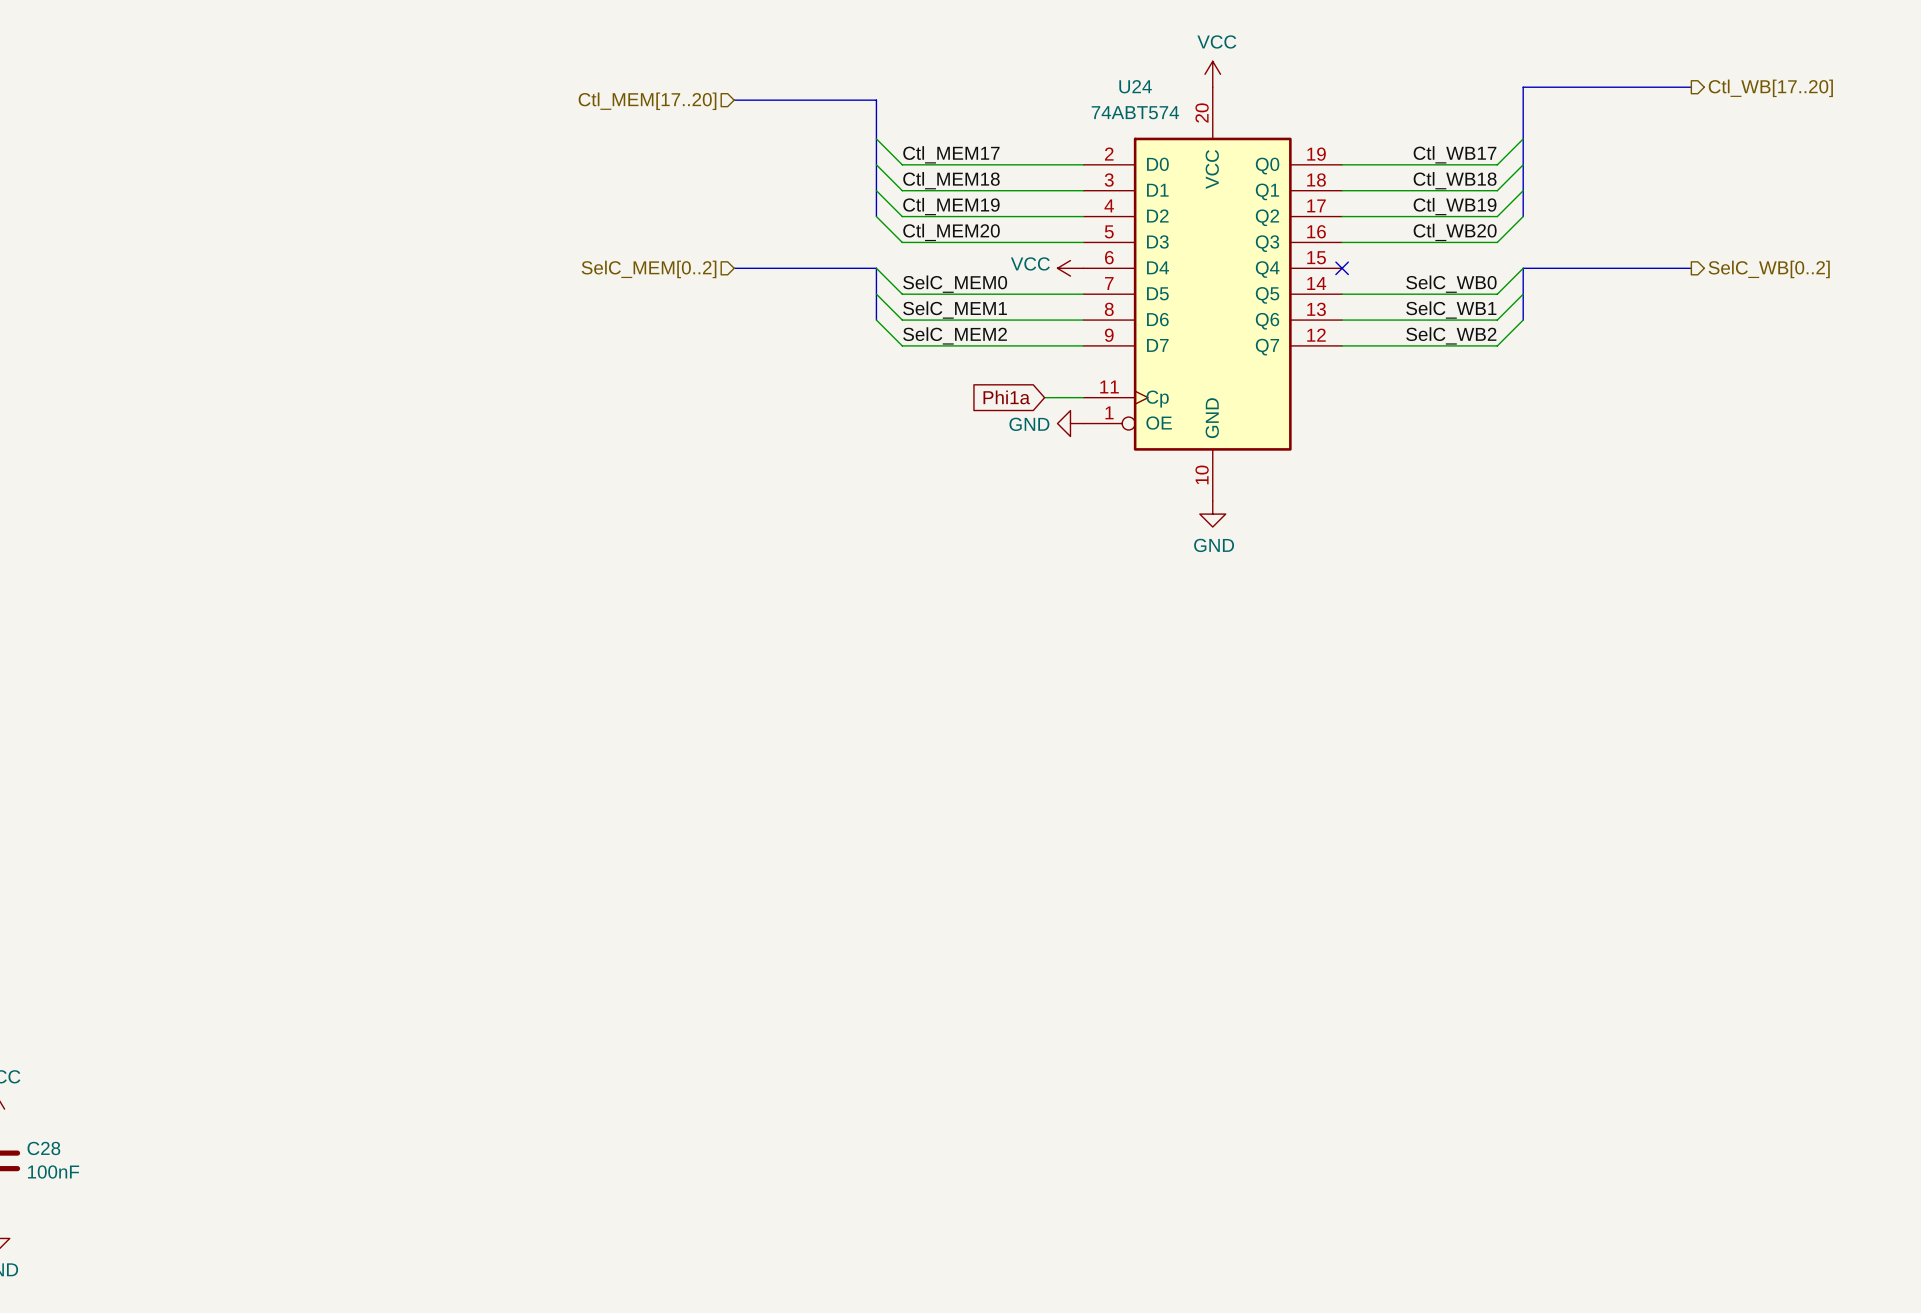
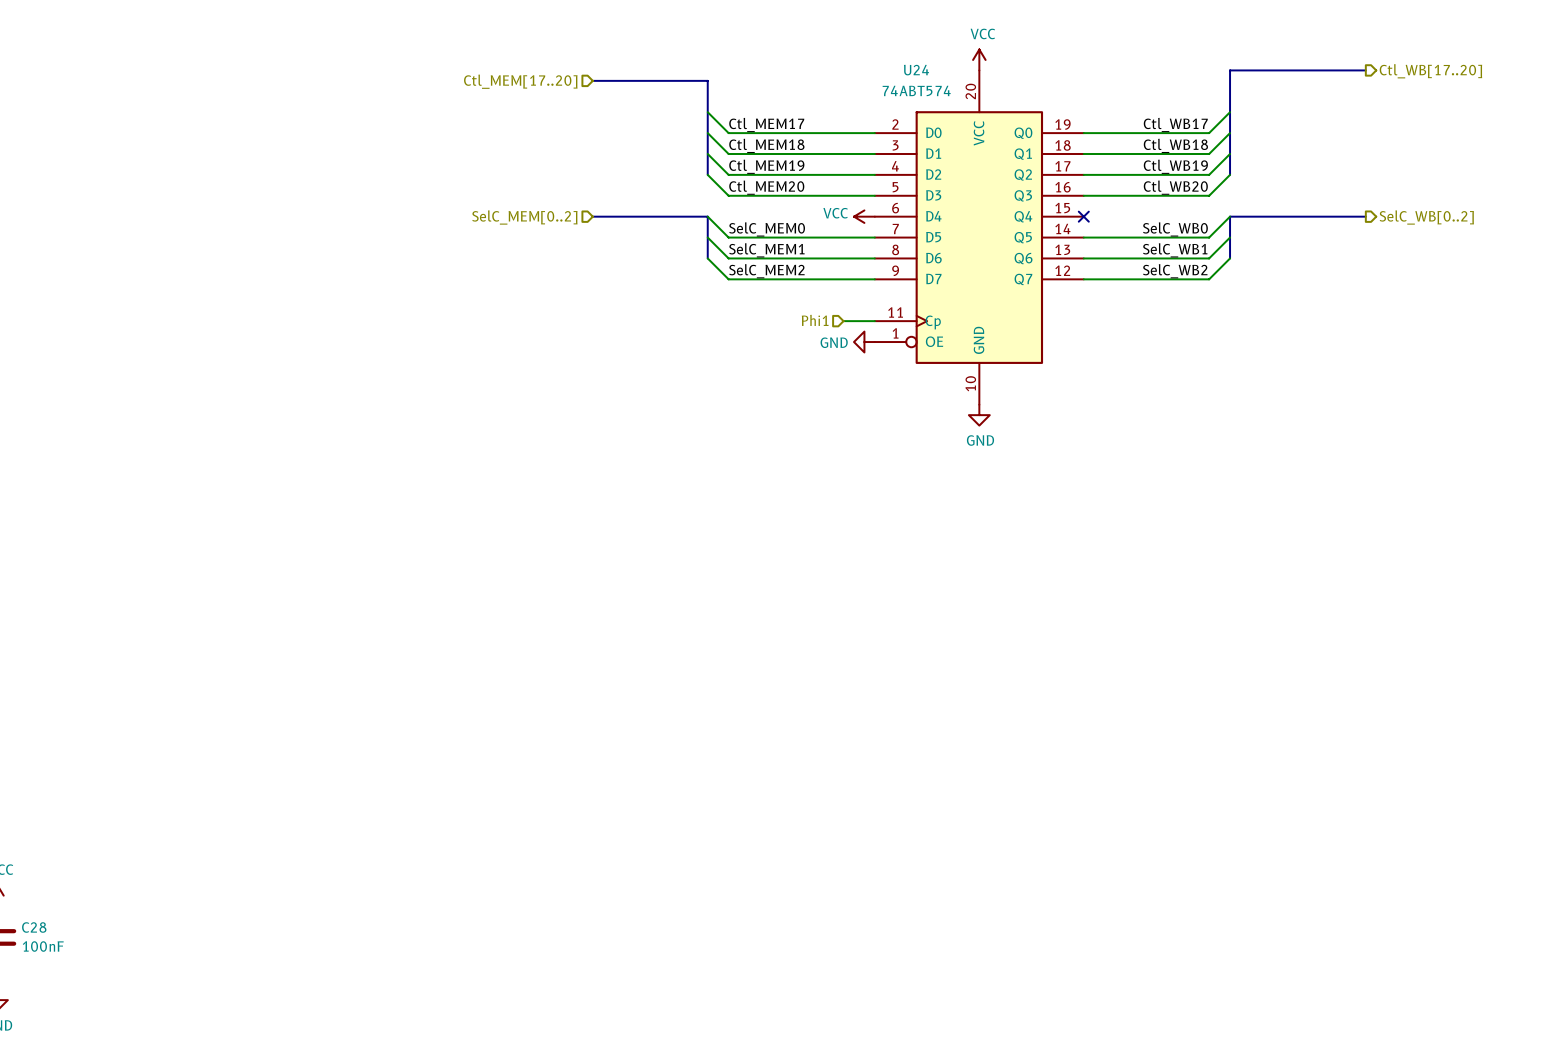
hierarchical label: none -> Phi1 (815, 320)
global label: Phi1a (1006, 397) -> none

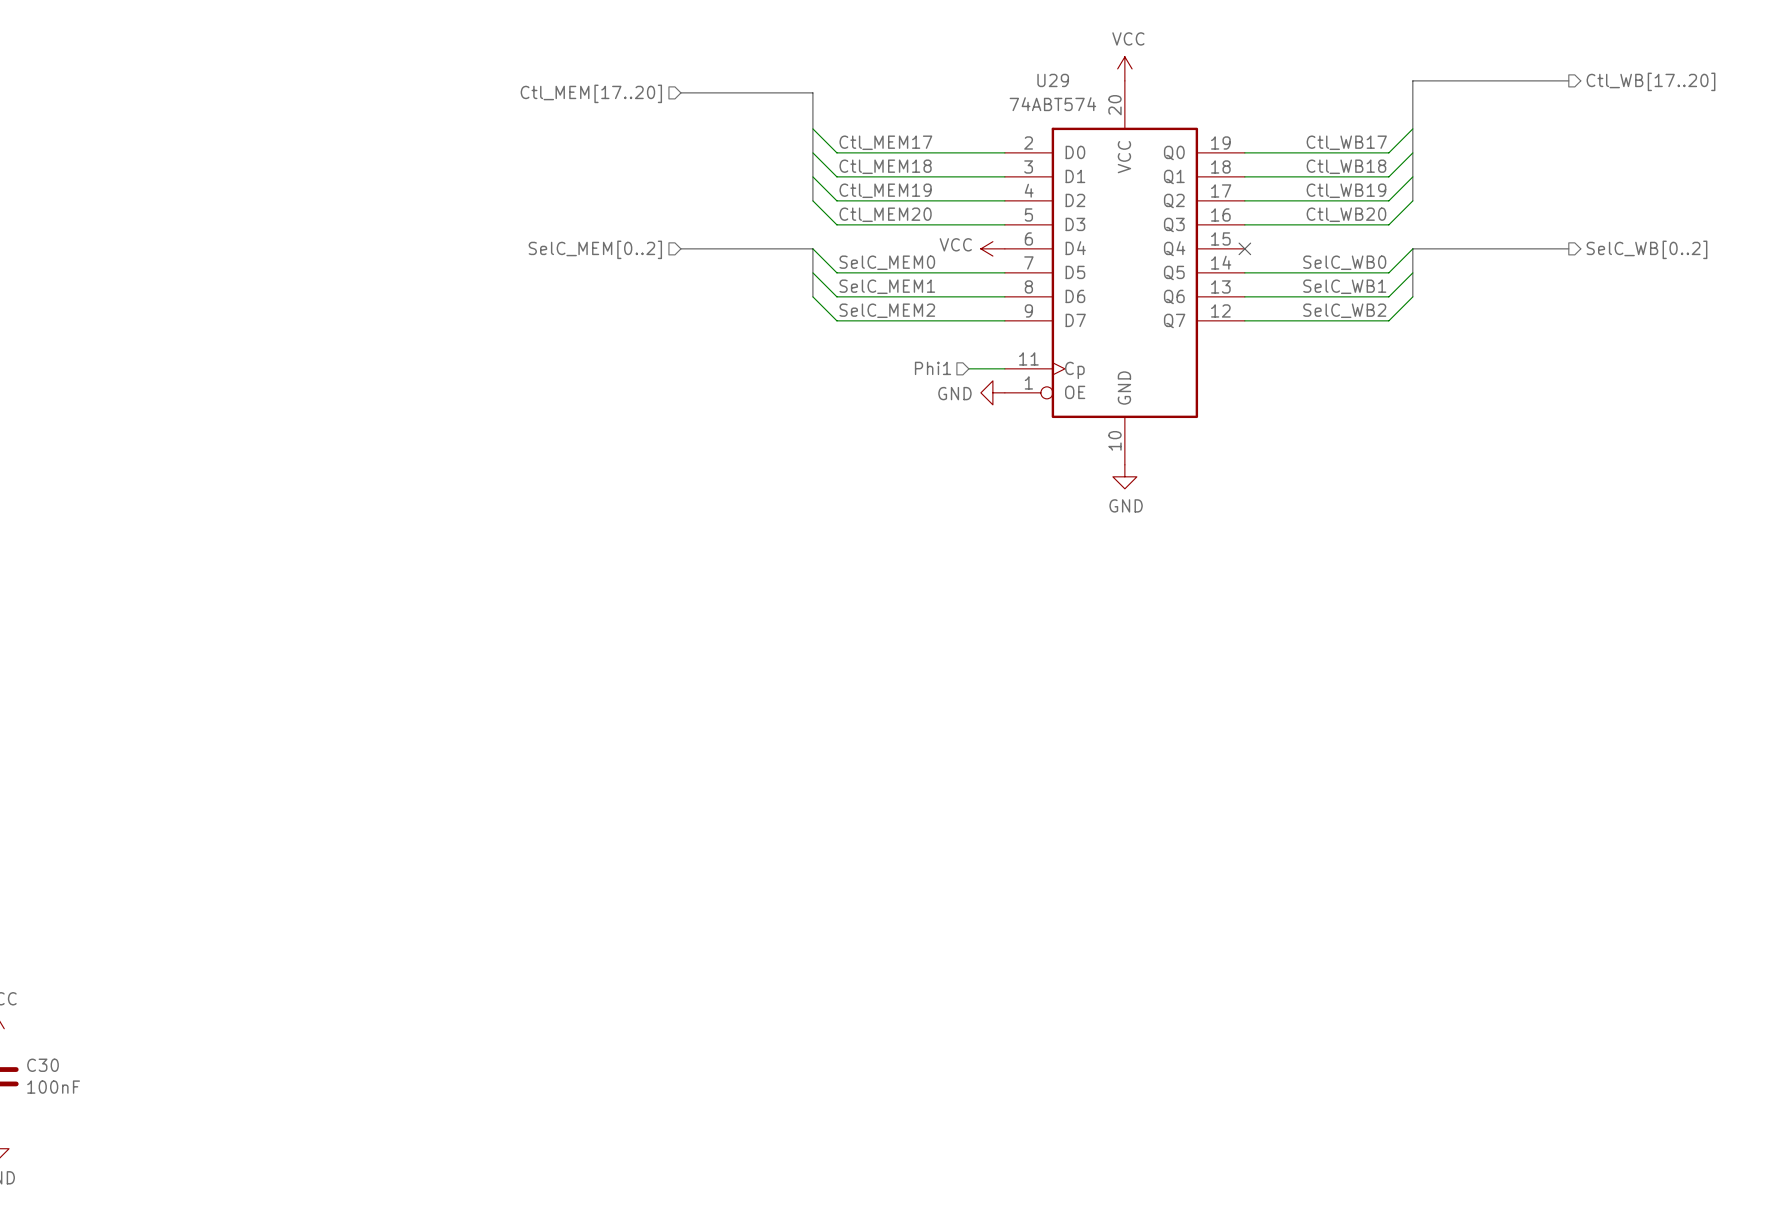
U24 name: U24 (916, 70) -> U29 (1053, 80)
C28 name: C28 (34, 927) -> C30 (43, 1065)

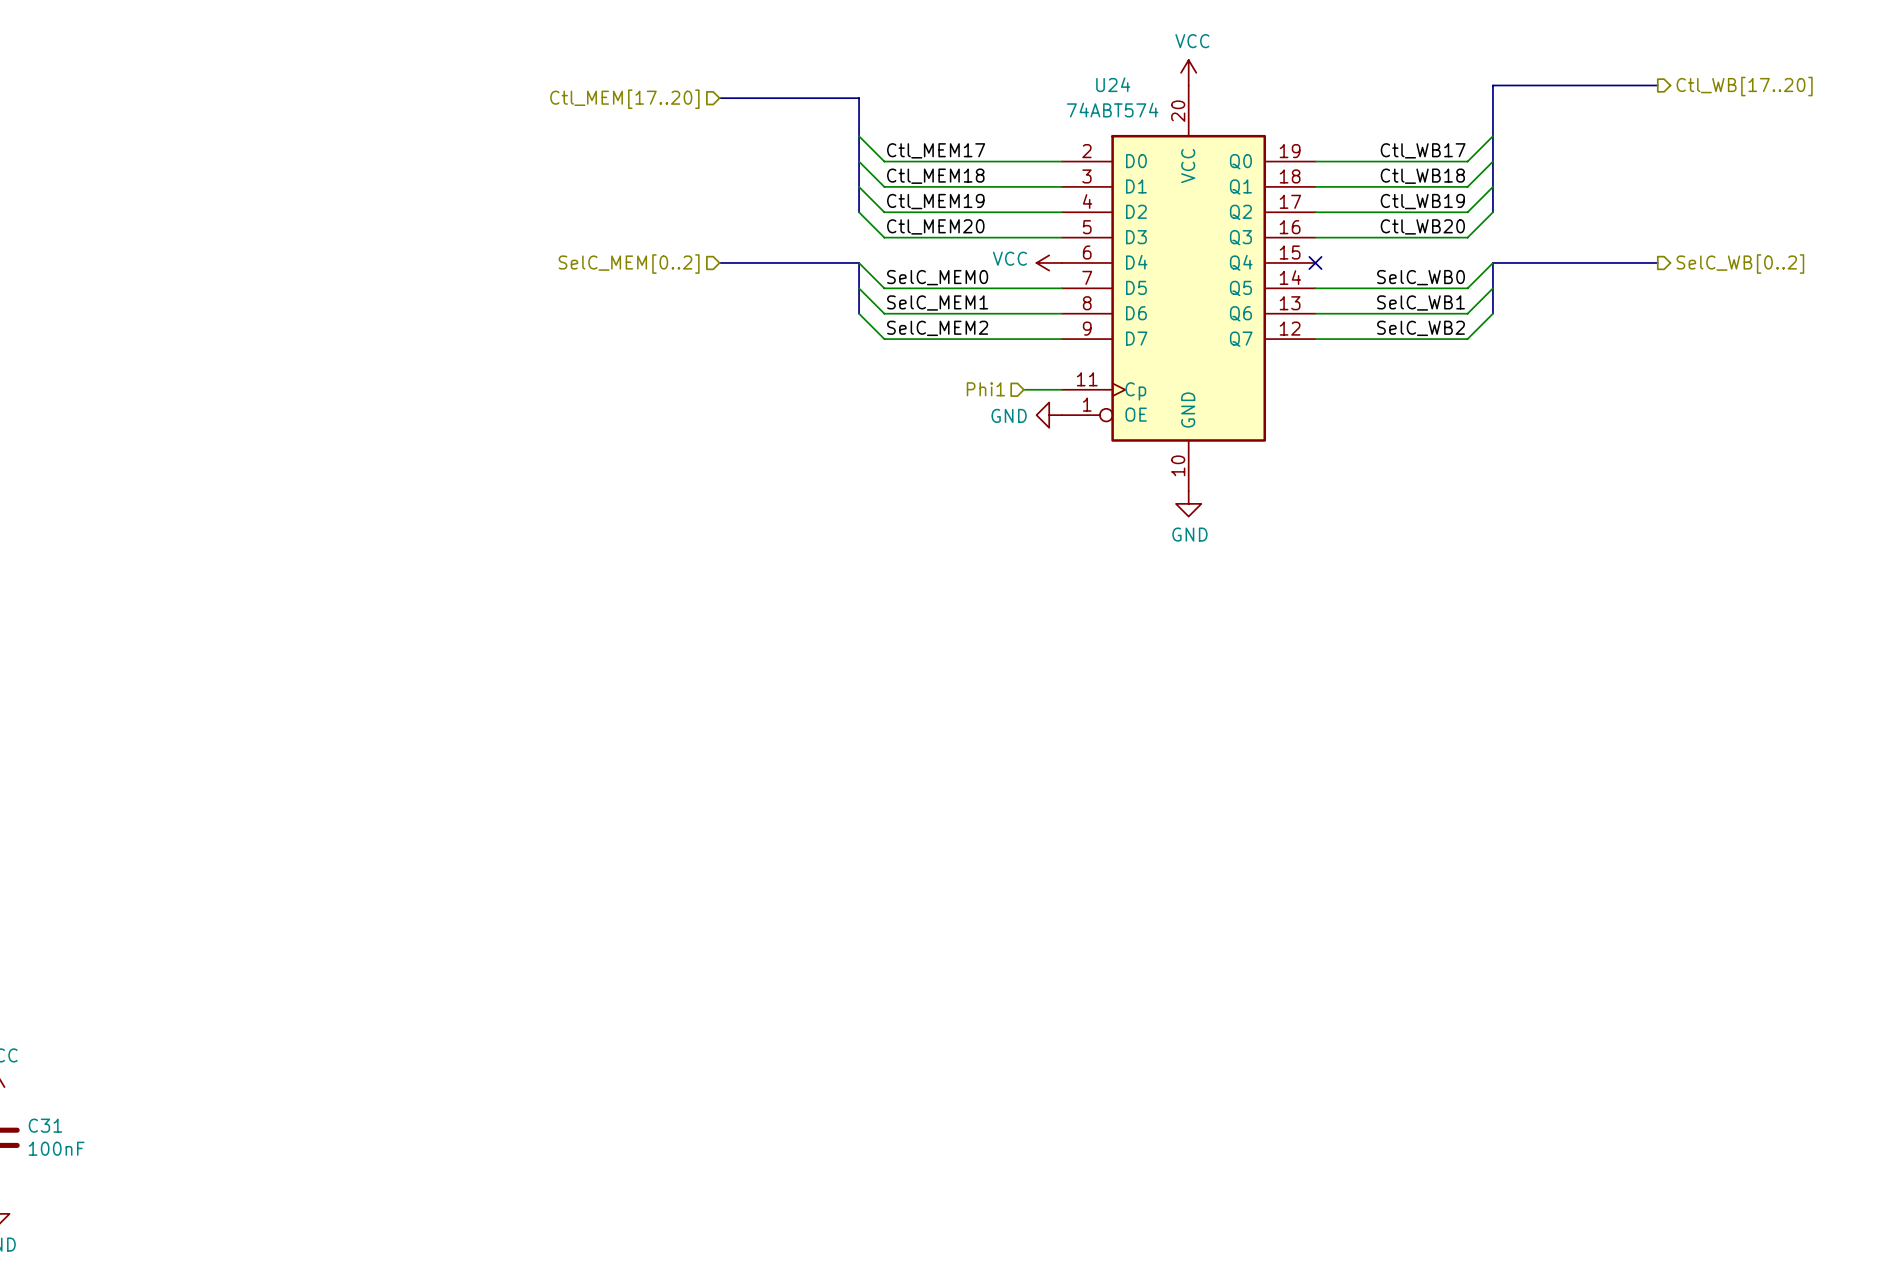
U29 name: U29 (1053, 80) -> U24 (1113, 84)
C30 name: C30 (43, 1065) -> C31 (45, 1125)

